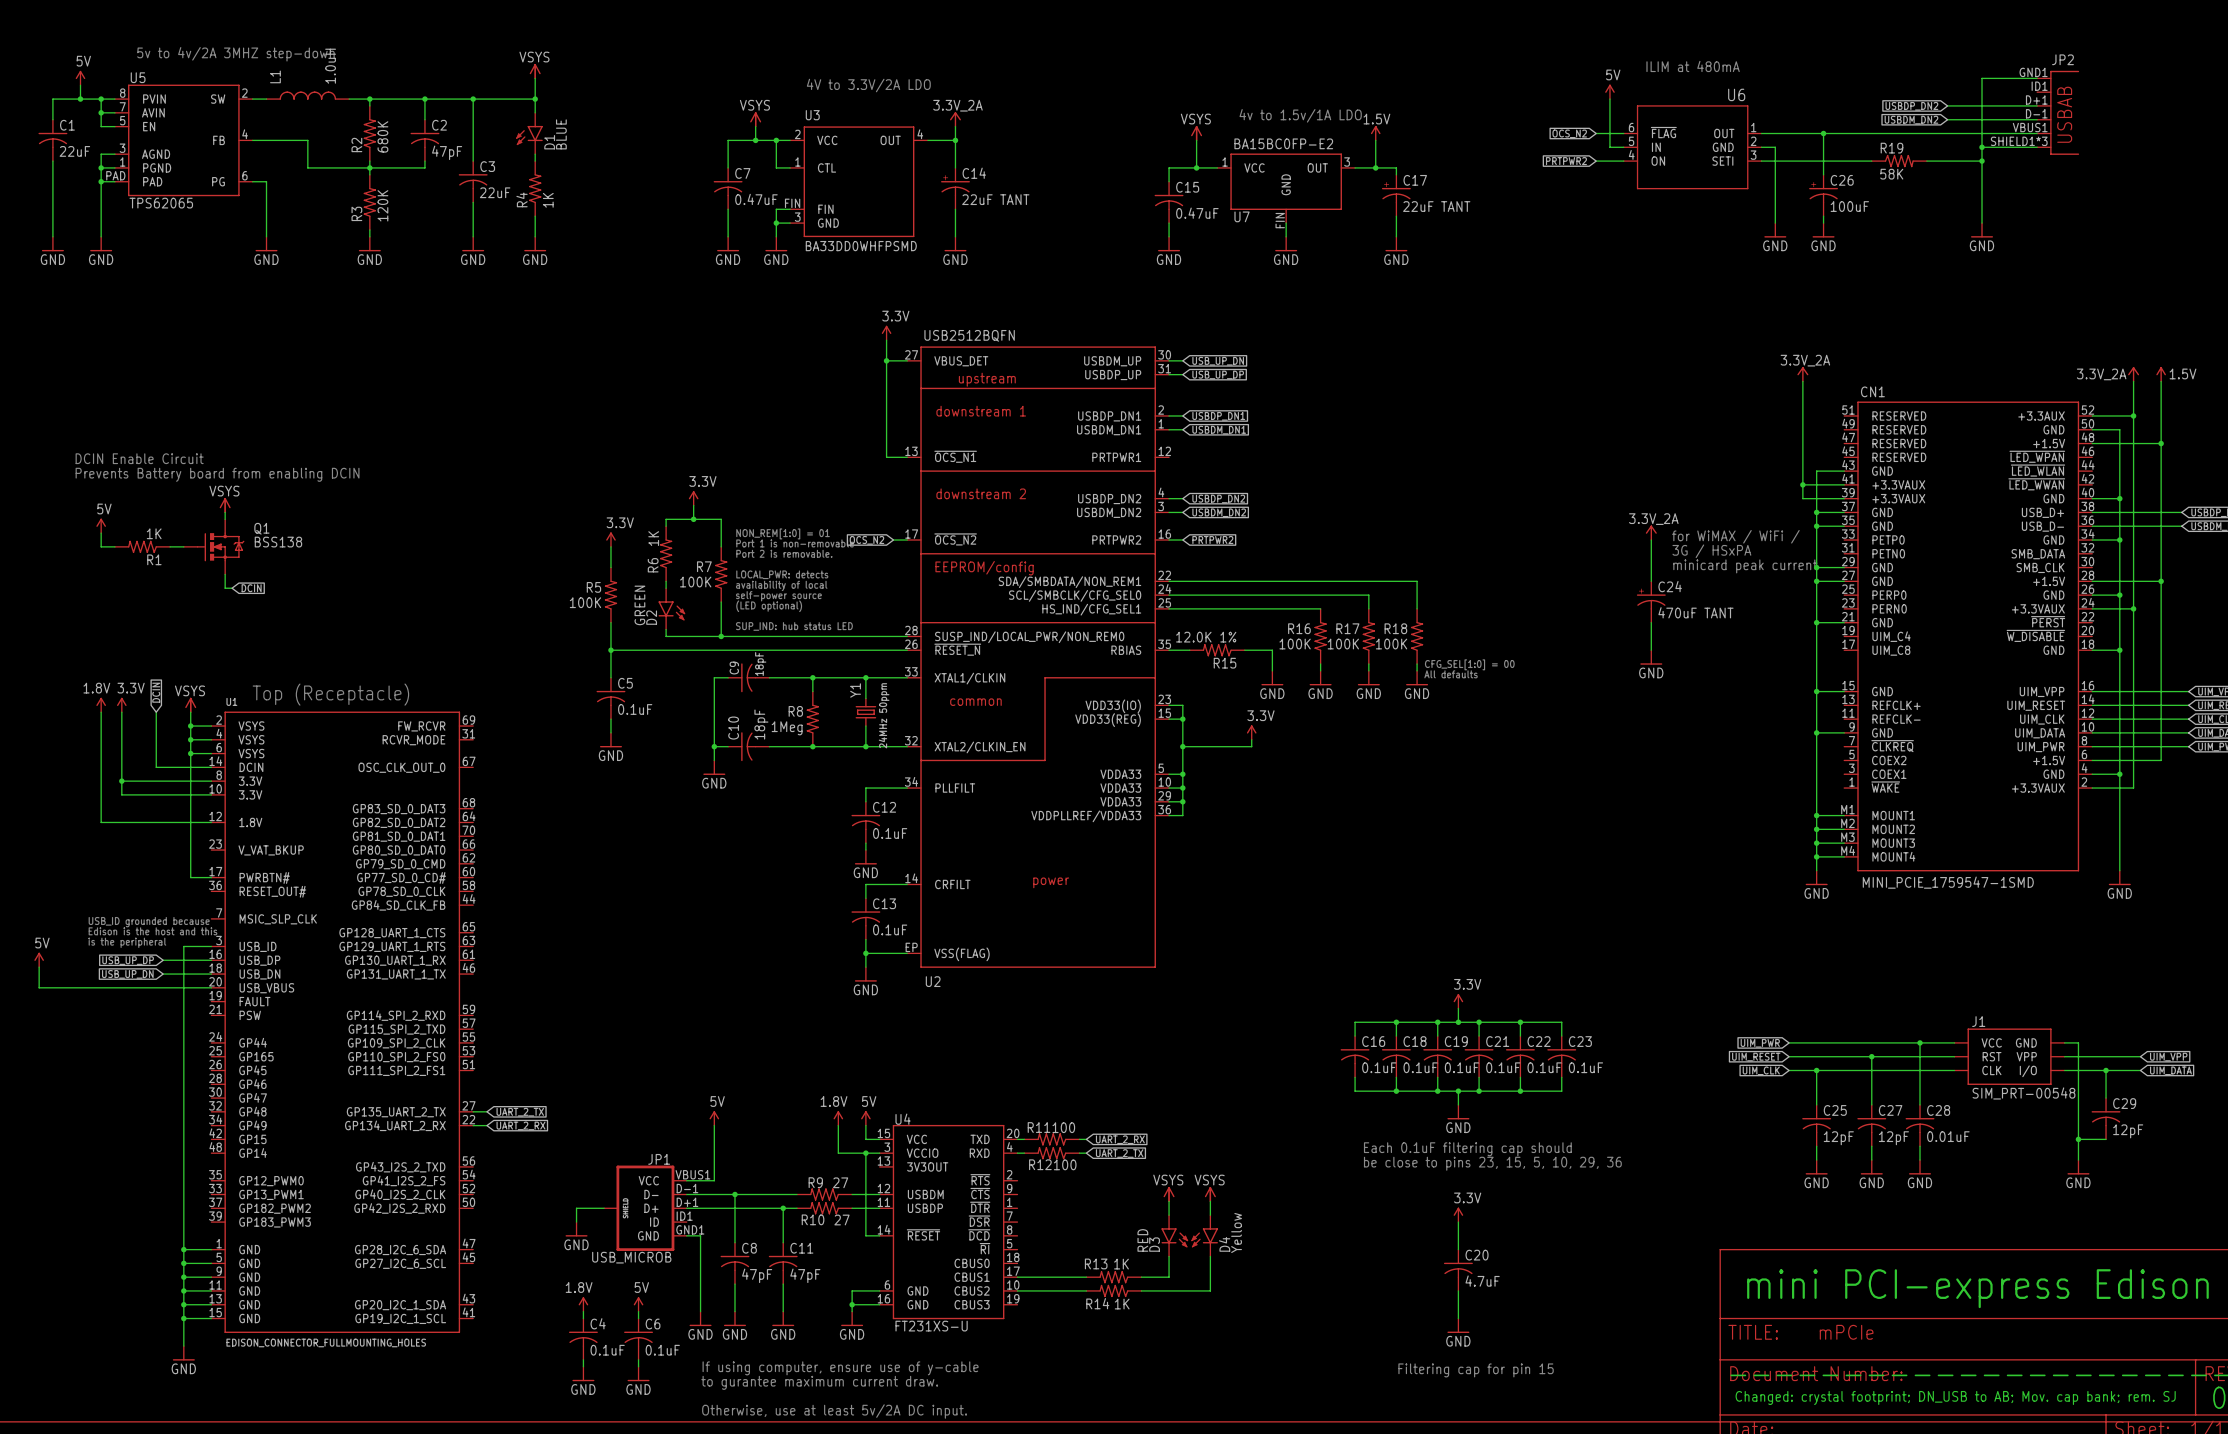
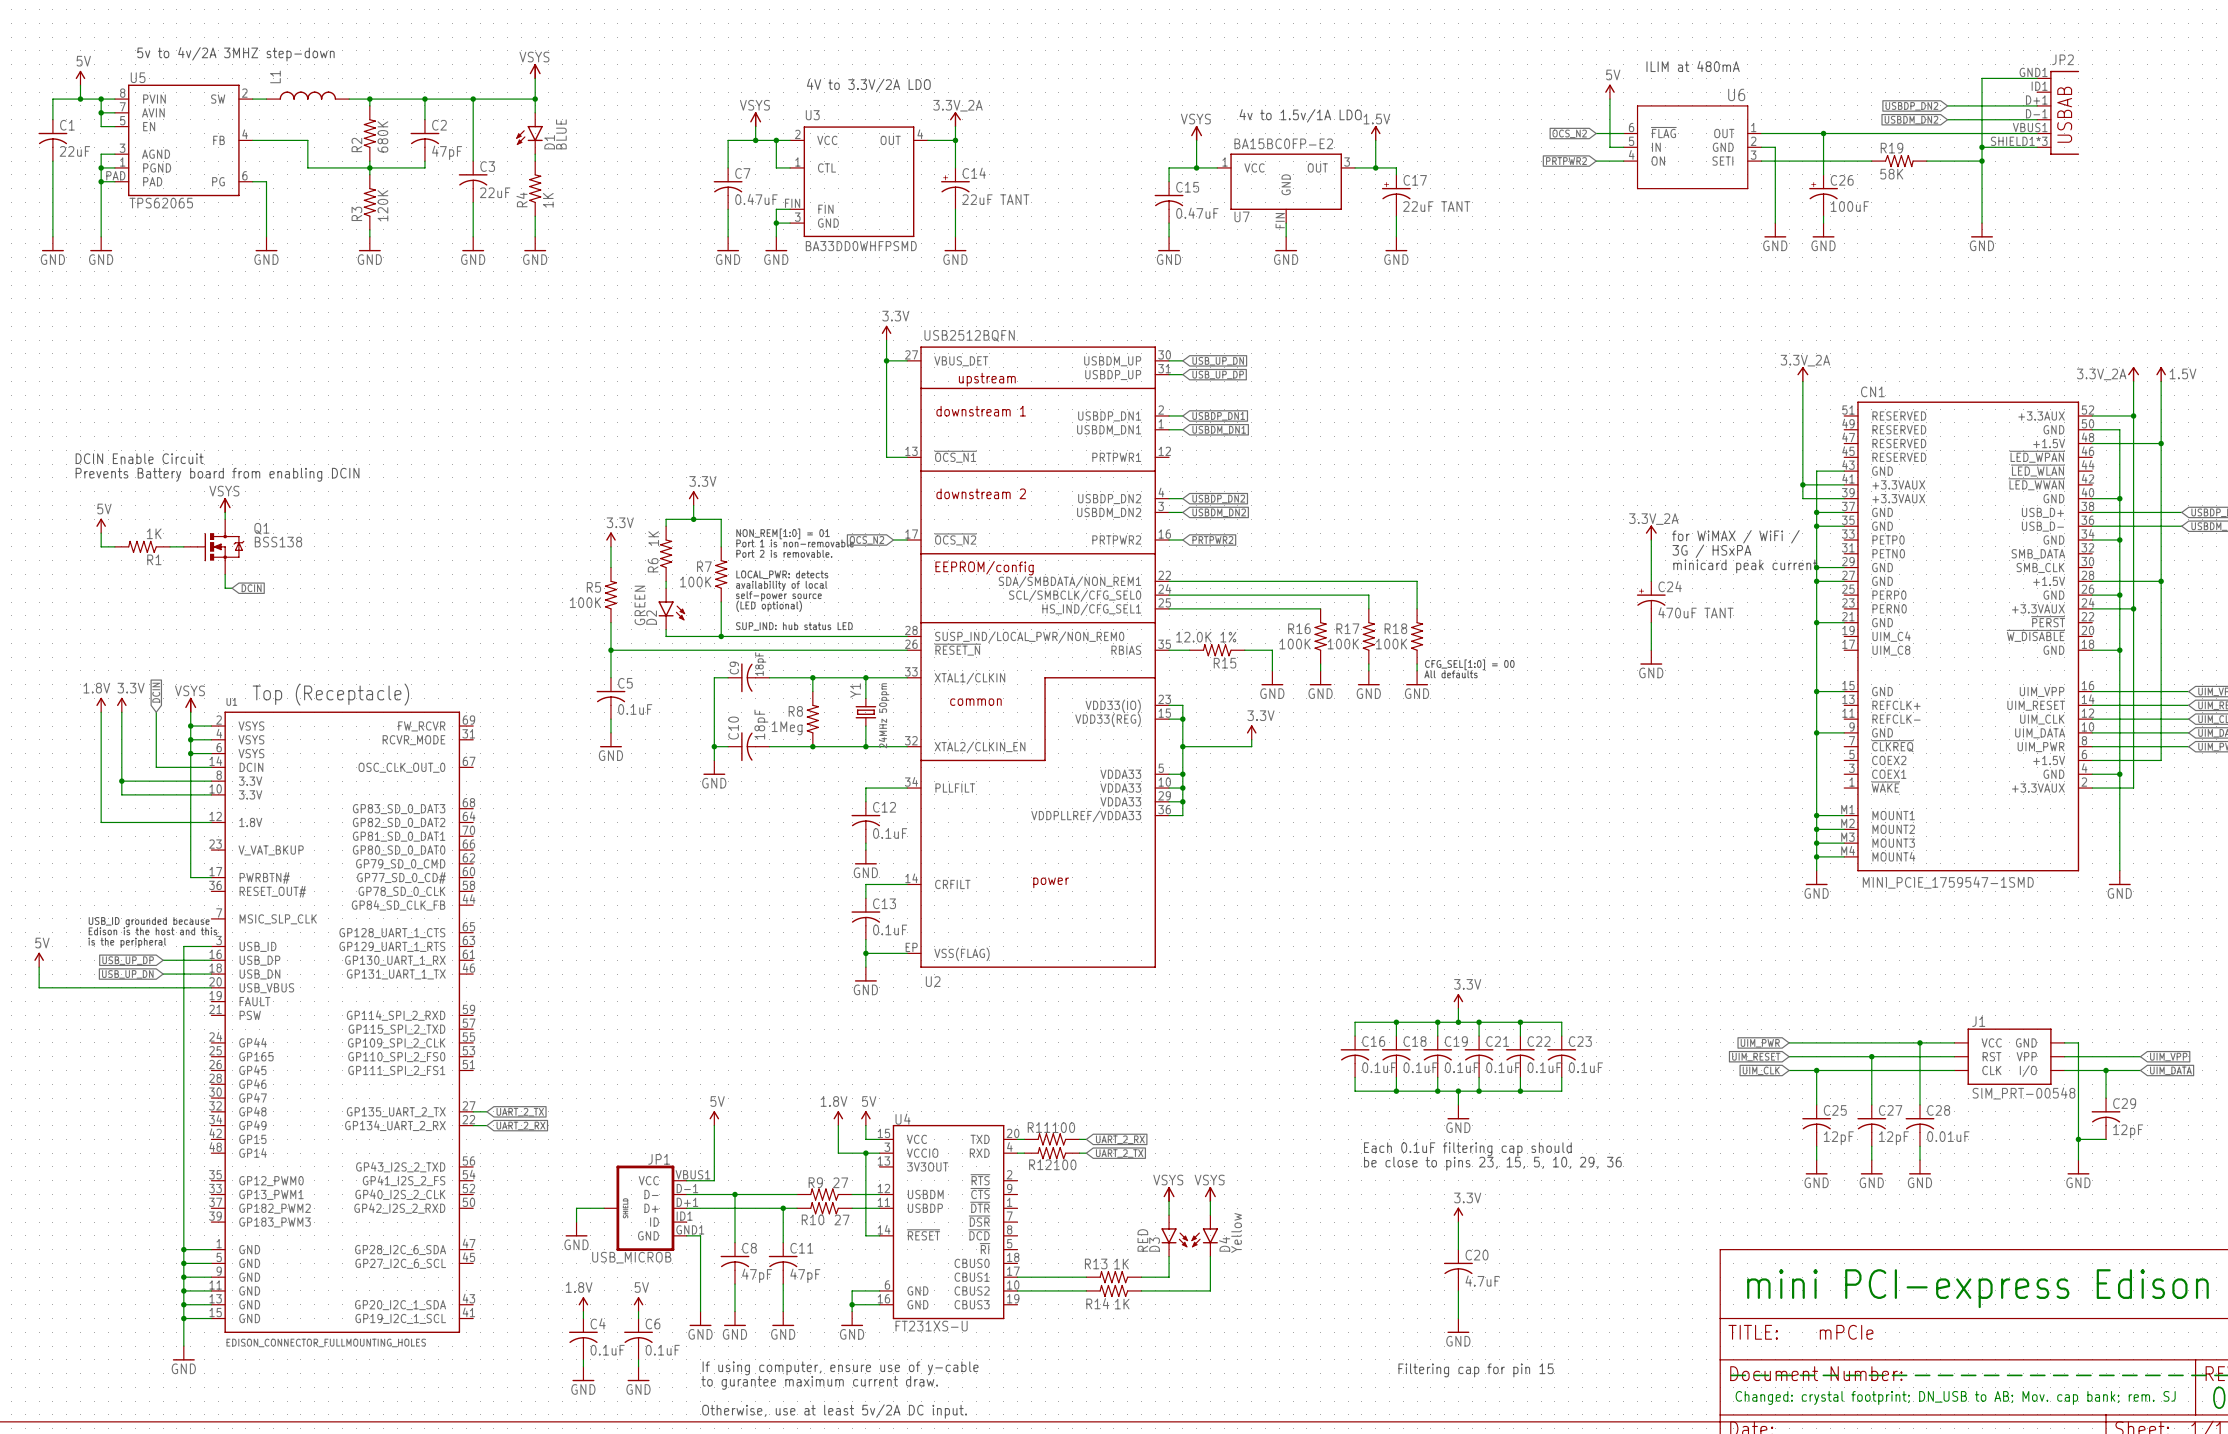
L1 value: 1.0uH (330, 66) -> none

